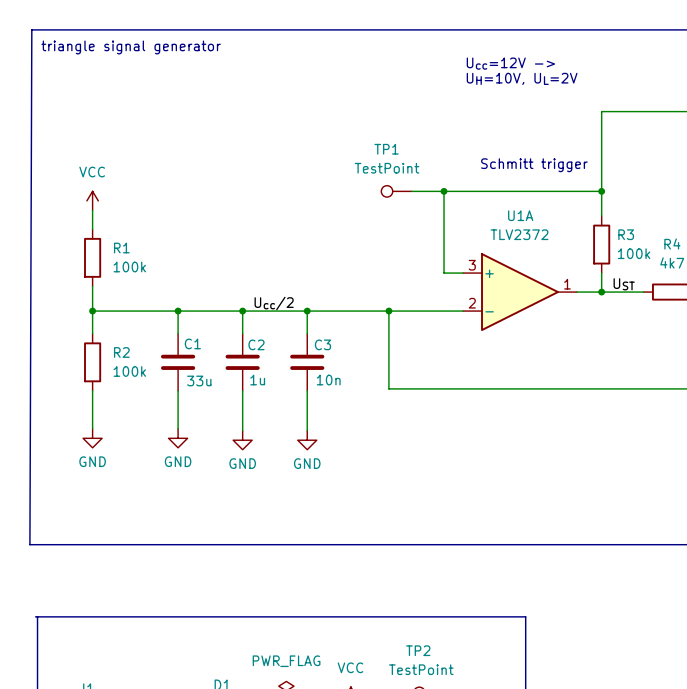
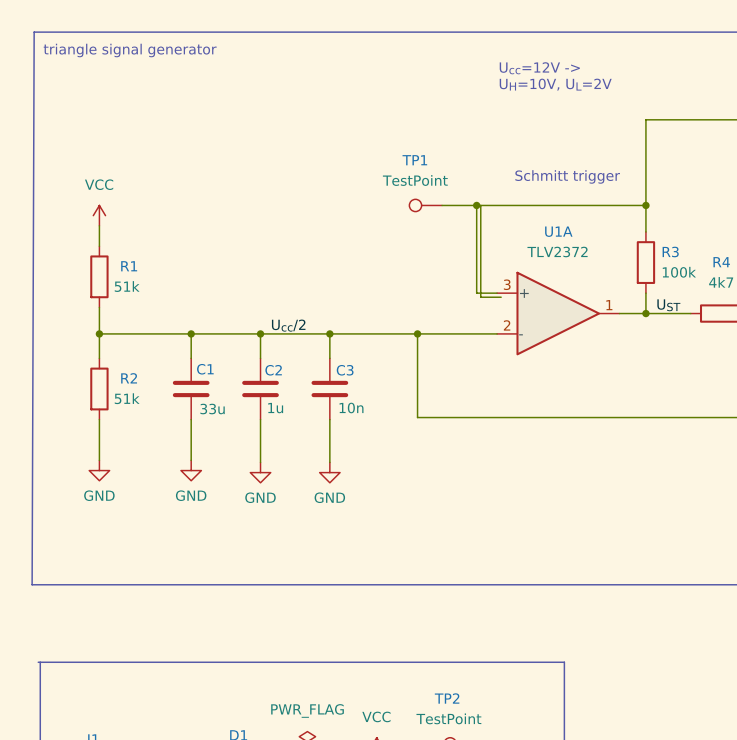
wire: none -> (480, 205) (480, 297) (501, 297)
R1 value: 100k (129, 267) -> 51k (127, 286)
R2 value: 100k (129, 371) -> 51k (127, 398)

